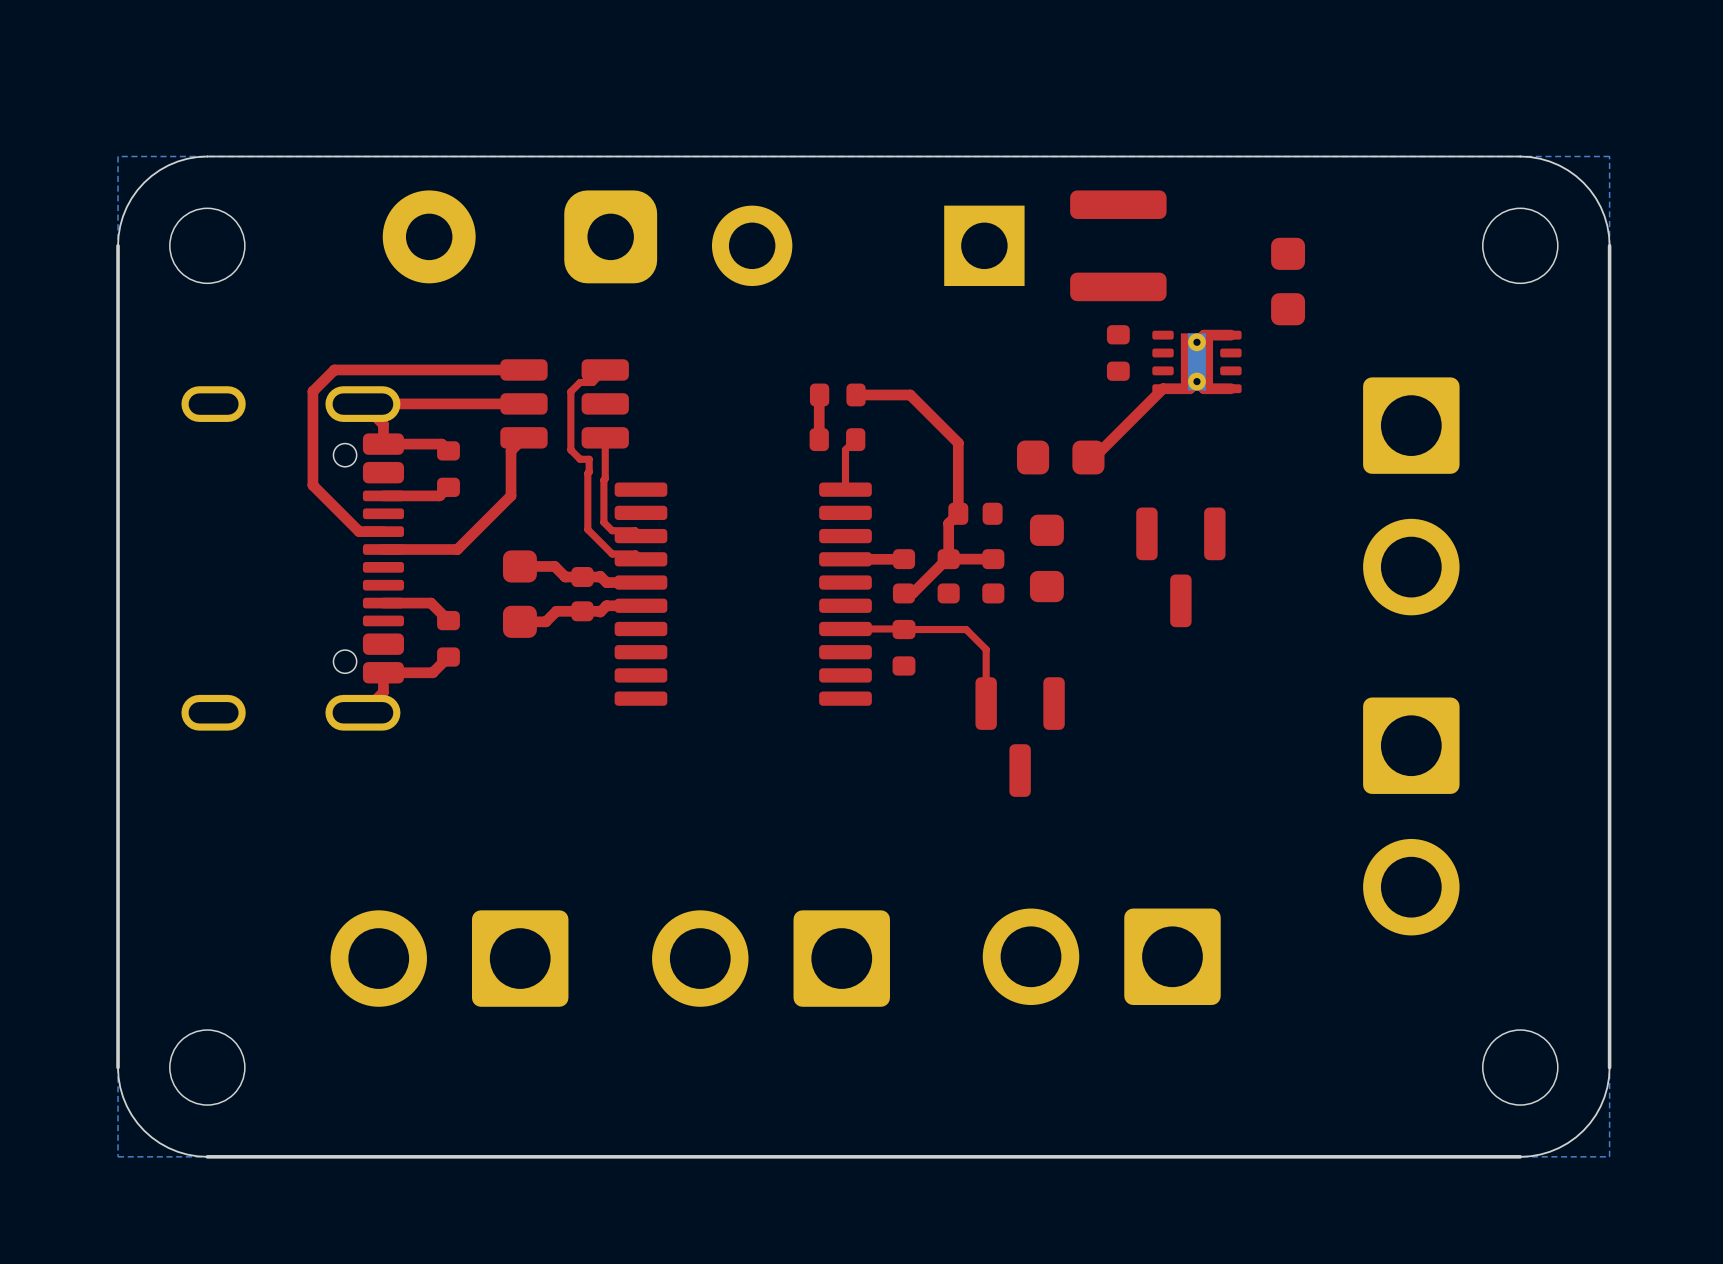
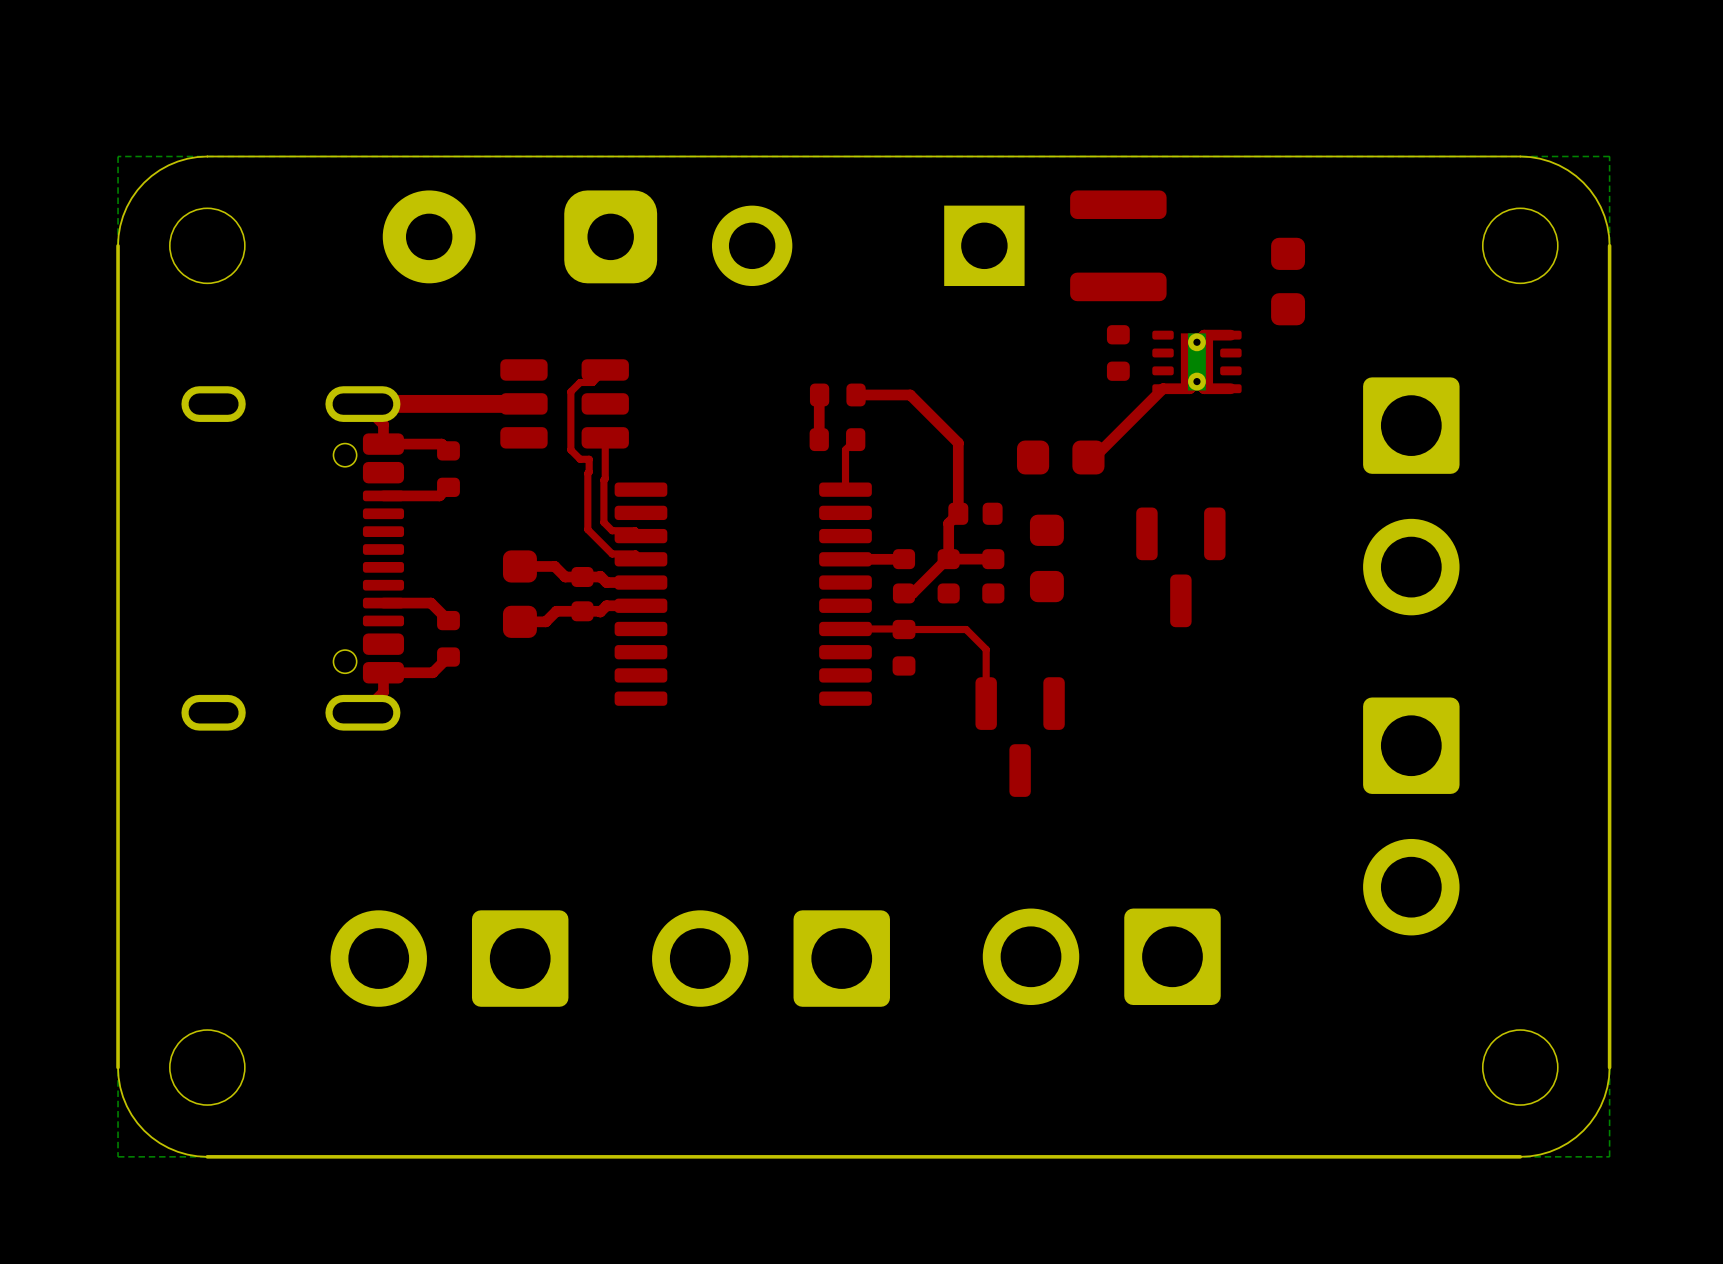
top track: (523, 369) (334, 369) (312, 391) (312, 485) (359, 531) (383, 531) -> none
top track width: thin (523, 403) (363, 403) -> thick (523, 403) (363, 403)
top track: (523, 437) (511, 450) (511, 495) (457, 549) (383, 549) -> none

